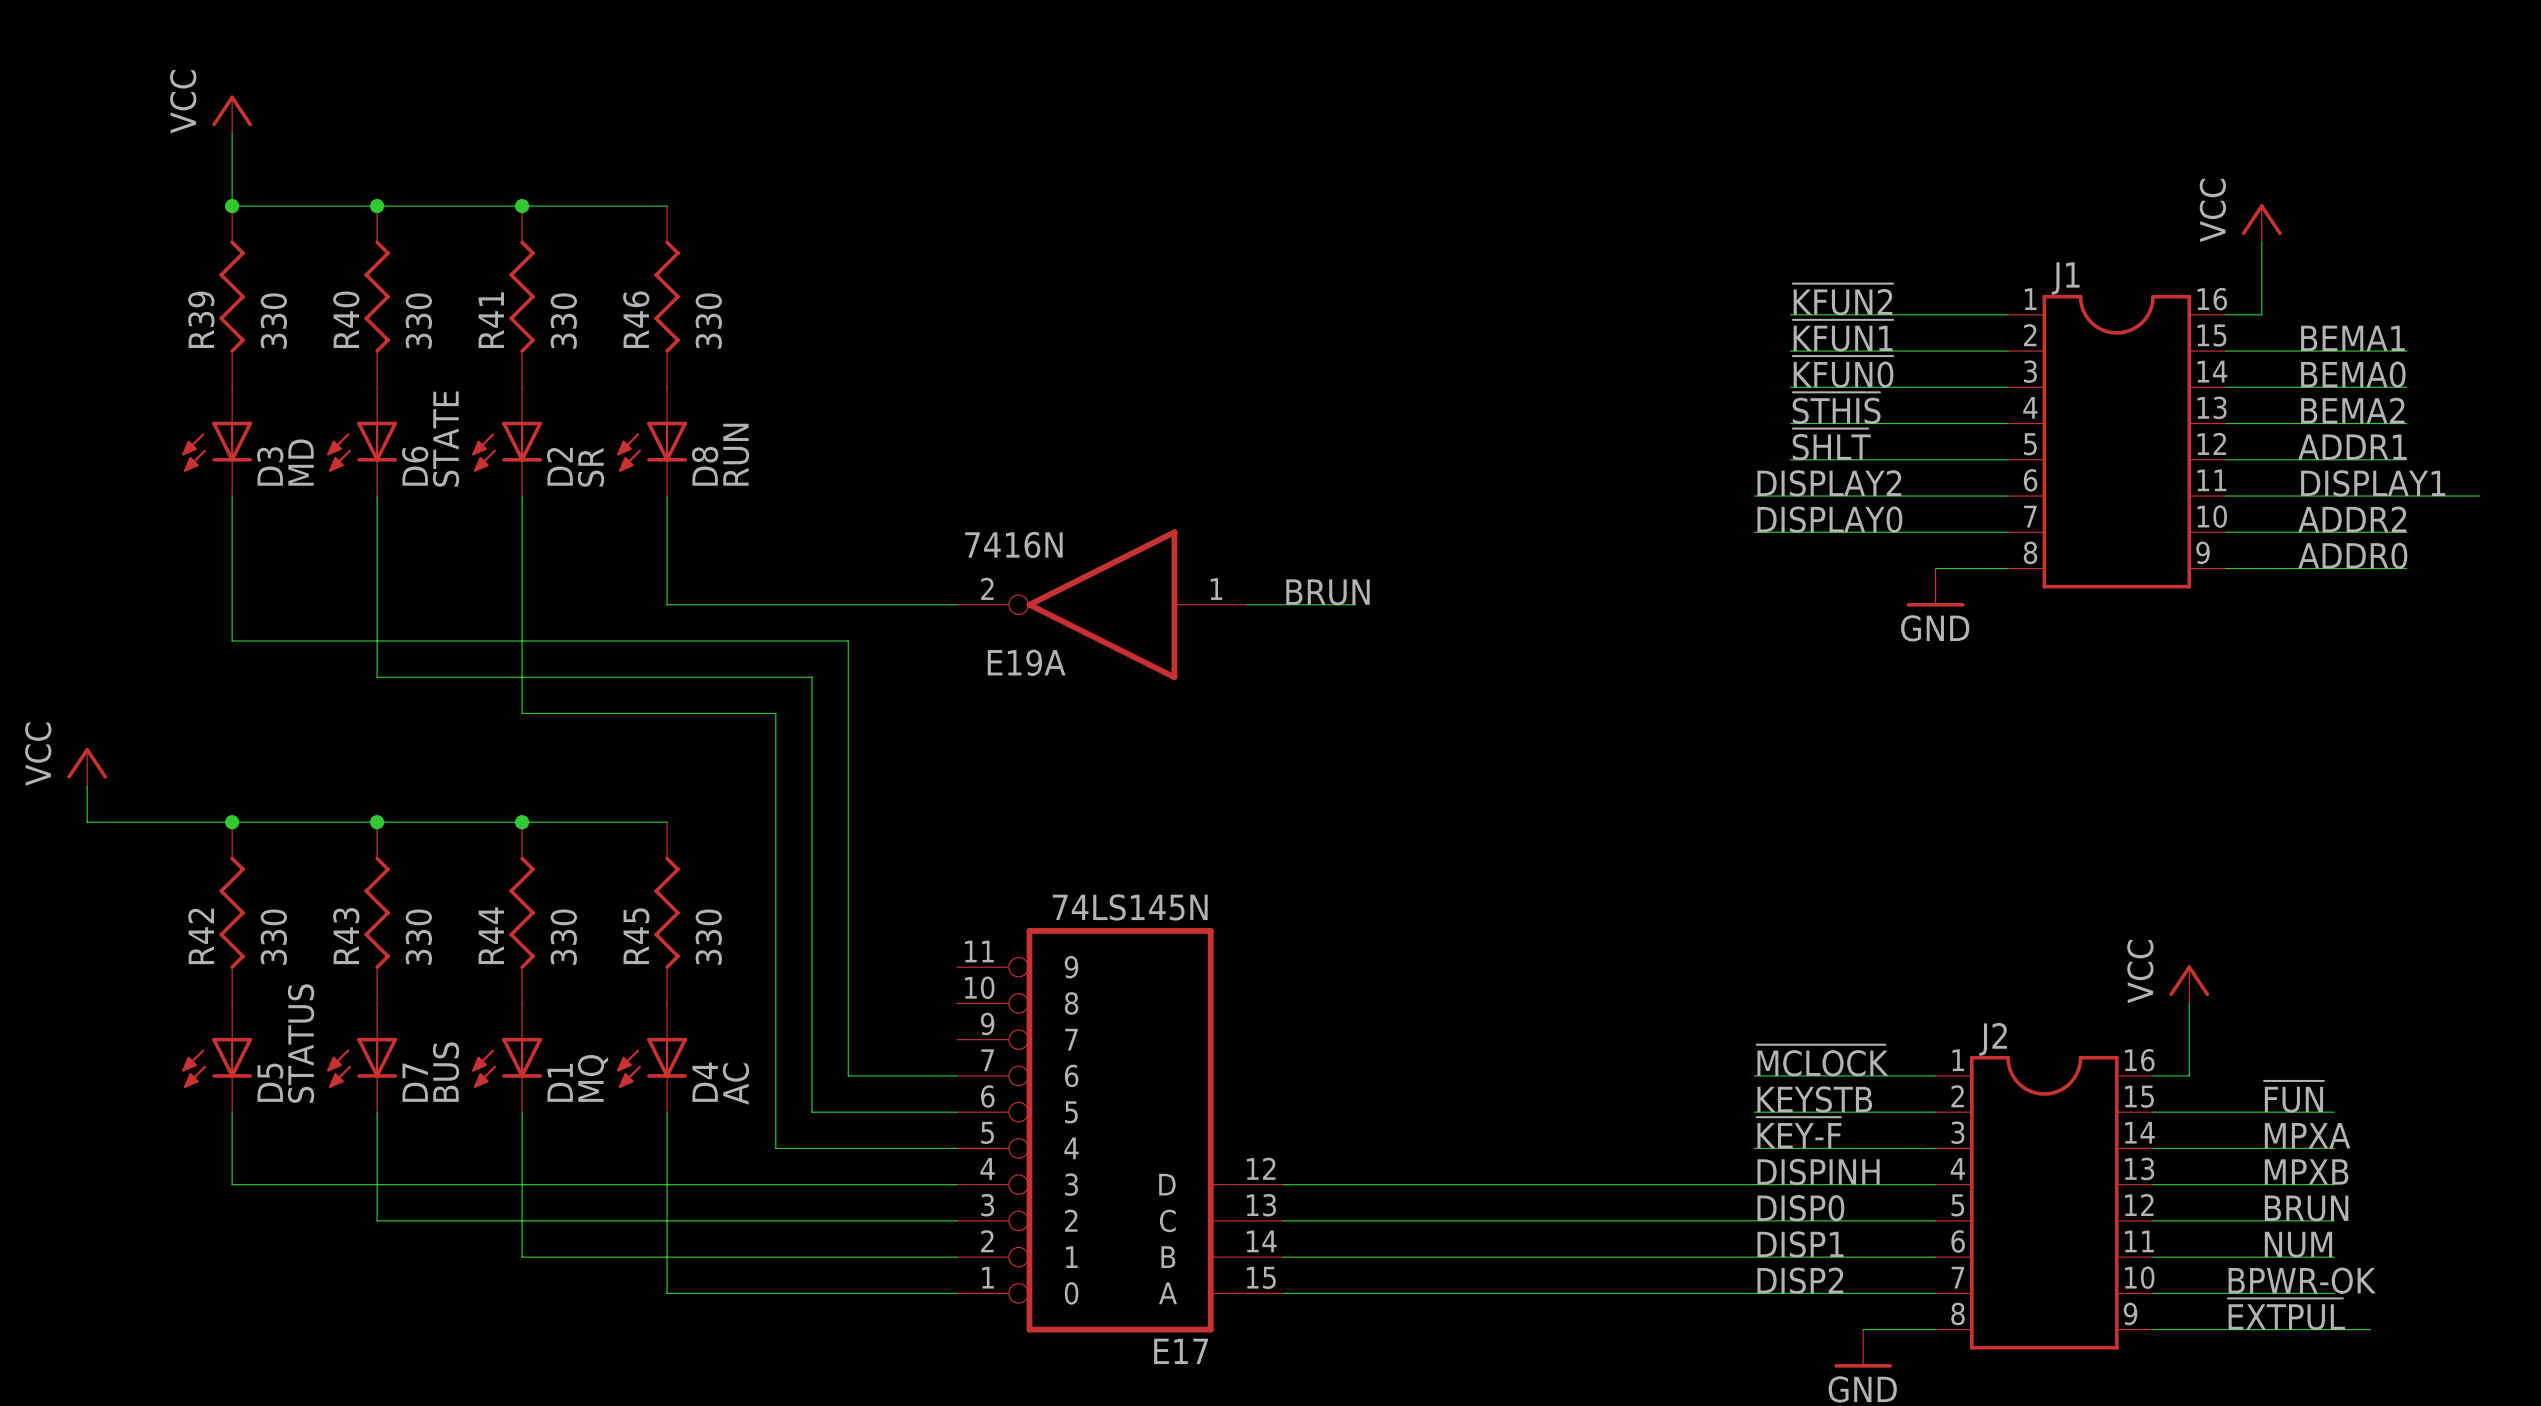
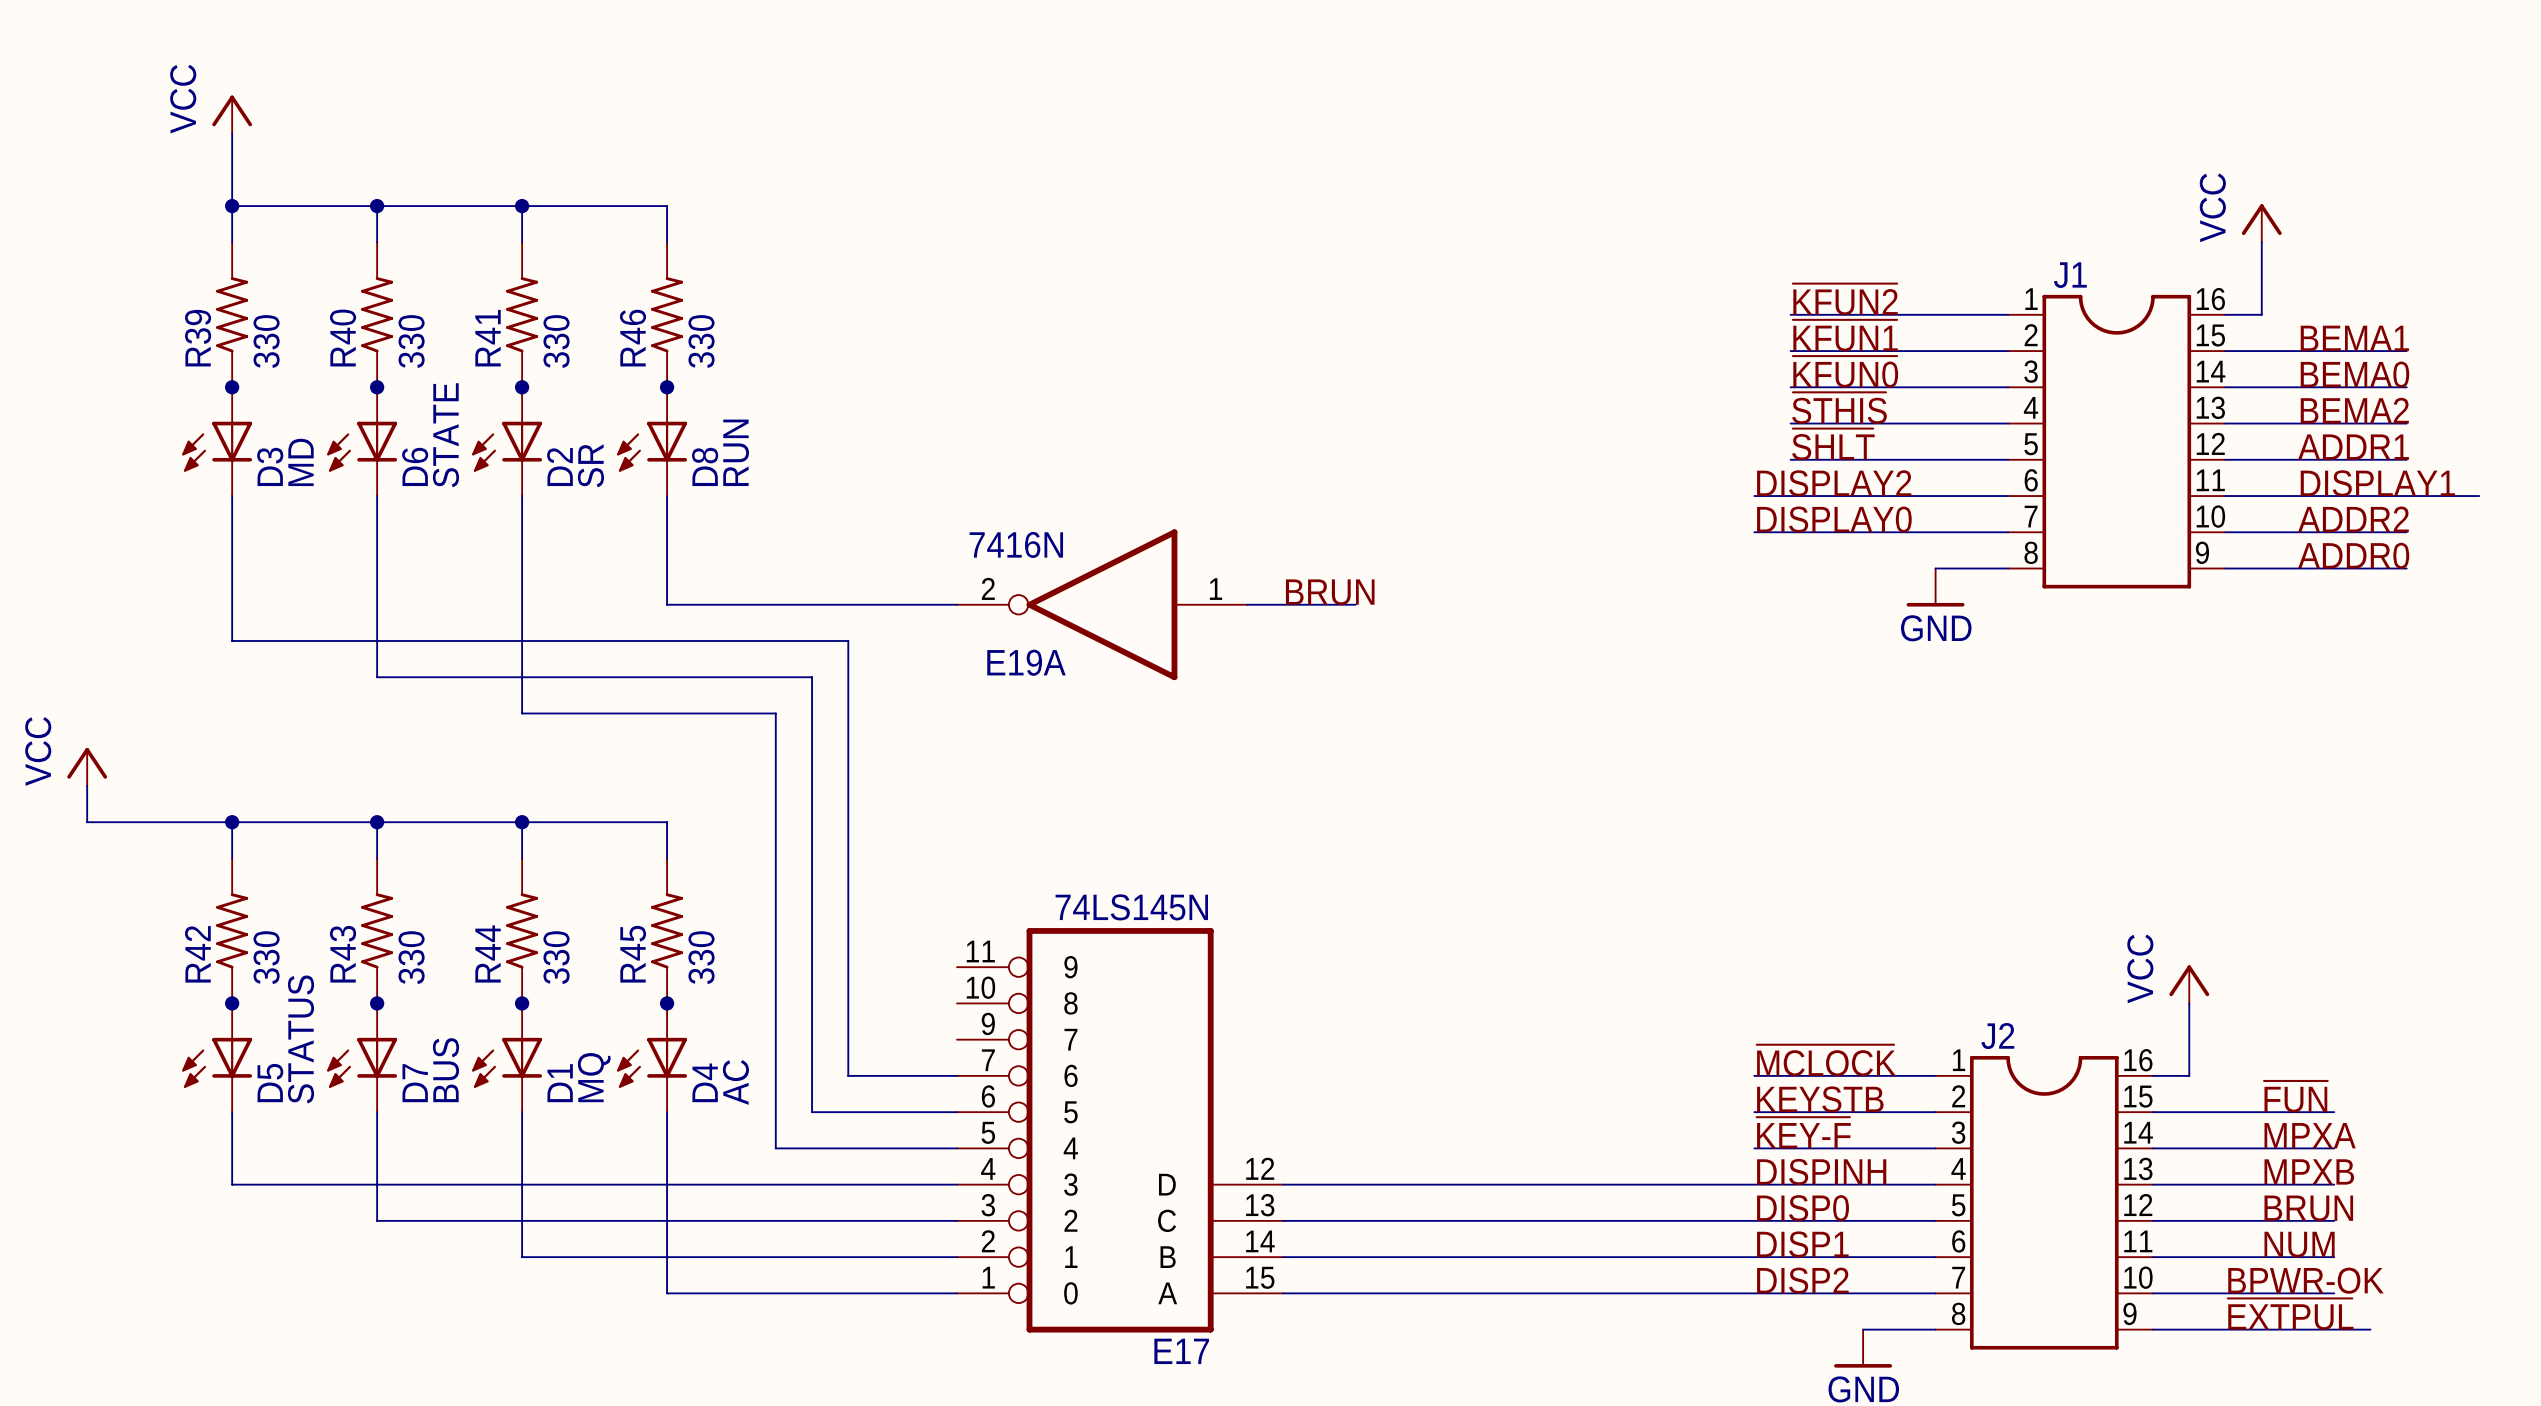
R39 symbol: [219, 206, 245, 388] -> [216, 242, 249, 388]
R40 symbol: [364, 206, 390, 388] -> [361, 242, 394, 388]
R41 symbol: [509, 206, 535, 388] -> [506, 242, 539, 388]
R46 symbol: [654, 206, 680, 388] -> [651, 242, 684, 388]
junction: none -> (232, 387)
junction: none -> (377, 387)
junction: none -> (522, 387)
junction: none -> (667, 387)
R42 symbol: [219, 822, 245, 1004] -> [216, 858, 249, 1004]
R43 symbol: [364, 822, 390, 1004] -> [361, 858, 394, 1004]
R44 symbol: [509, 822, 535, 1004] -> [506, 858, 539, 1004]
R45 symbol: [654, 822, 680, 1004] -> [651, 858, 684, 1004]
junction: none -> (232, 1003)
junction: none -> (377, 1003)
junction: none -> (522, 1003)
junction: none -> (667, 1003)

